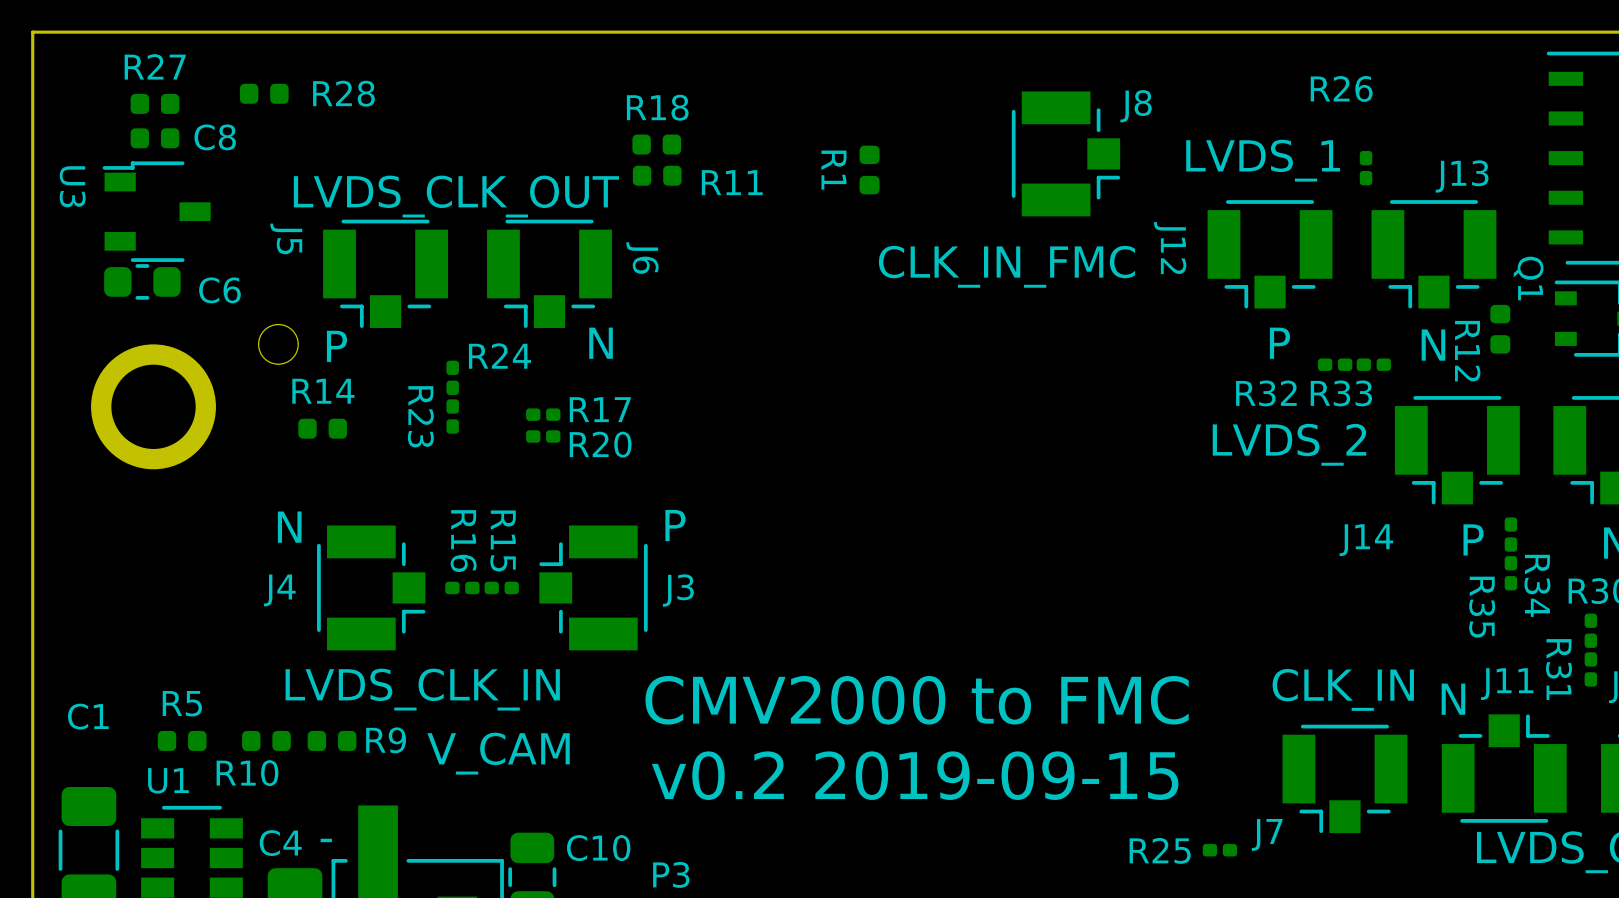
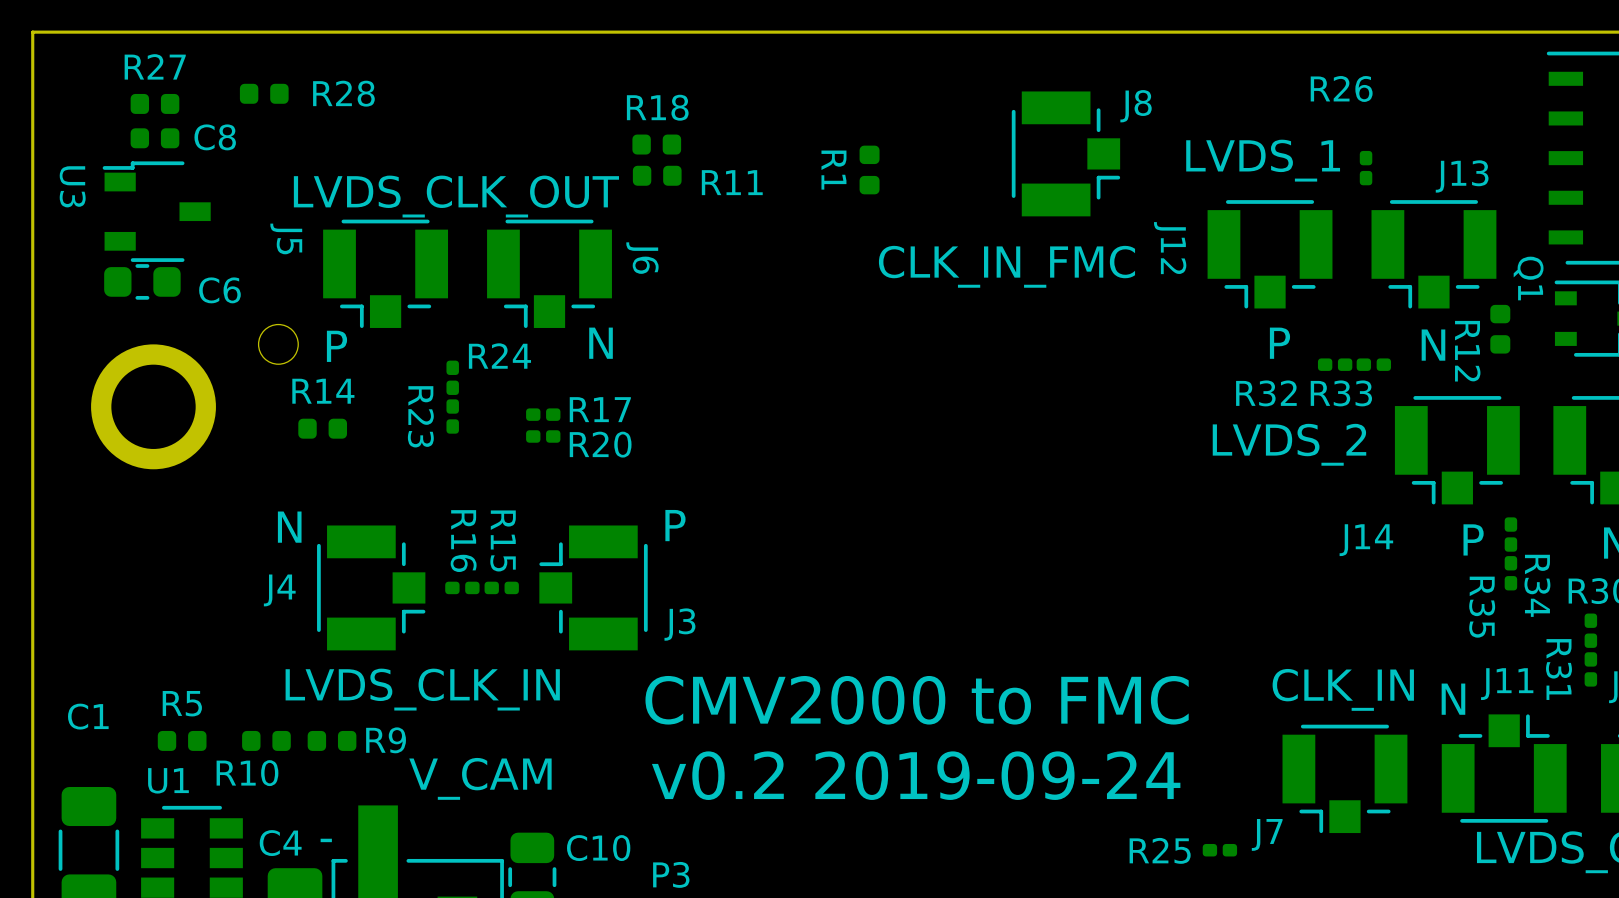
J3 name position: J3 (678, 590) -> J3 (679, 624)
text position: V_CAM (498, 753) -> V_CAM (480, 778)
text: v0.2 2019-09-15 (915, 775) -> v0.2 2019-09-24 (916, 775)

